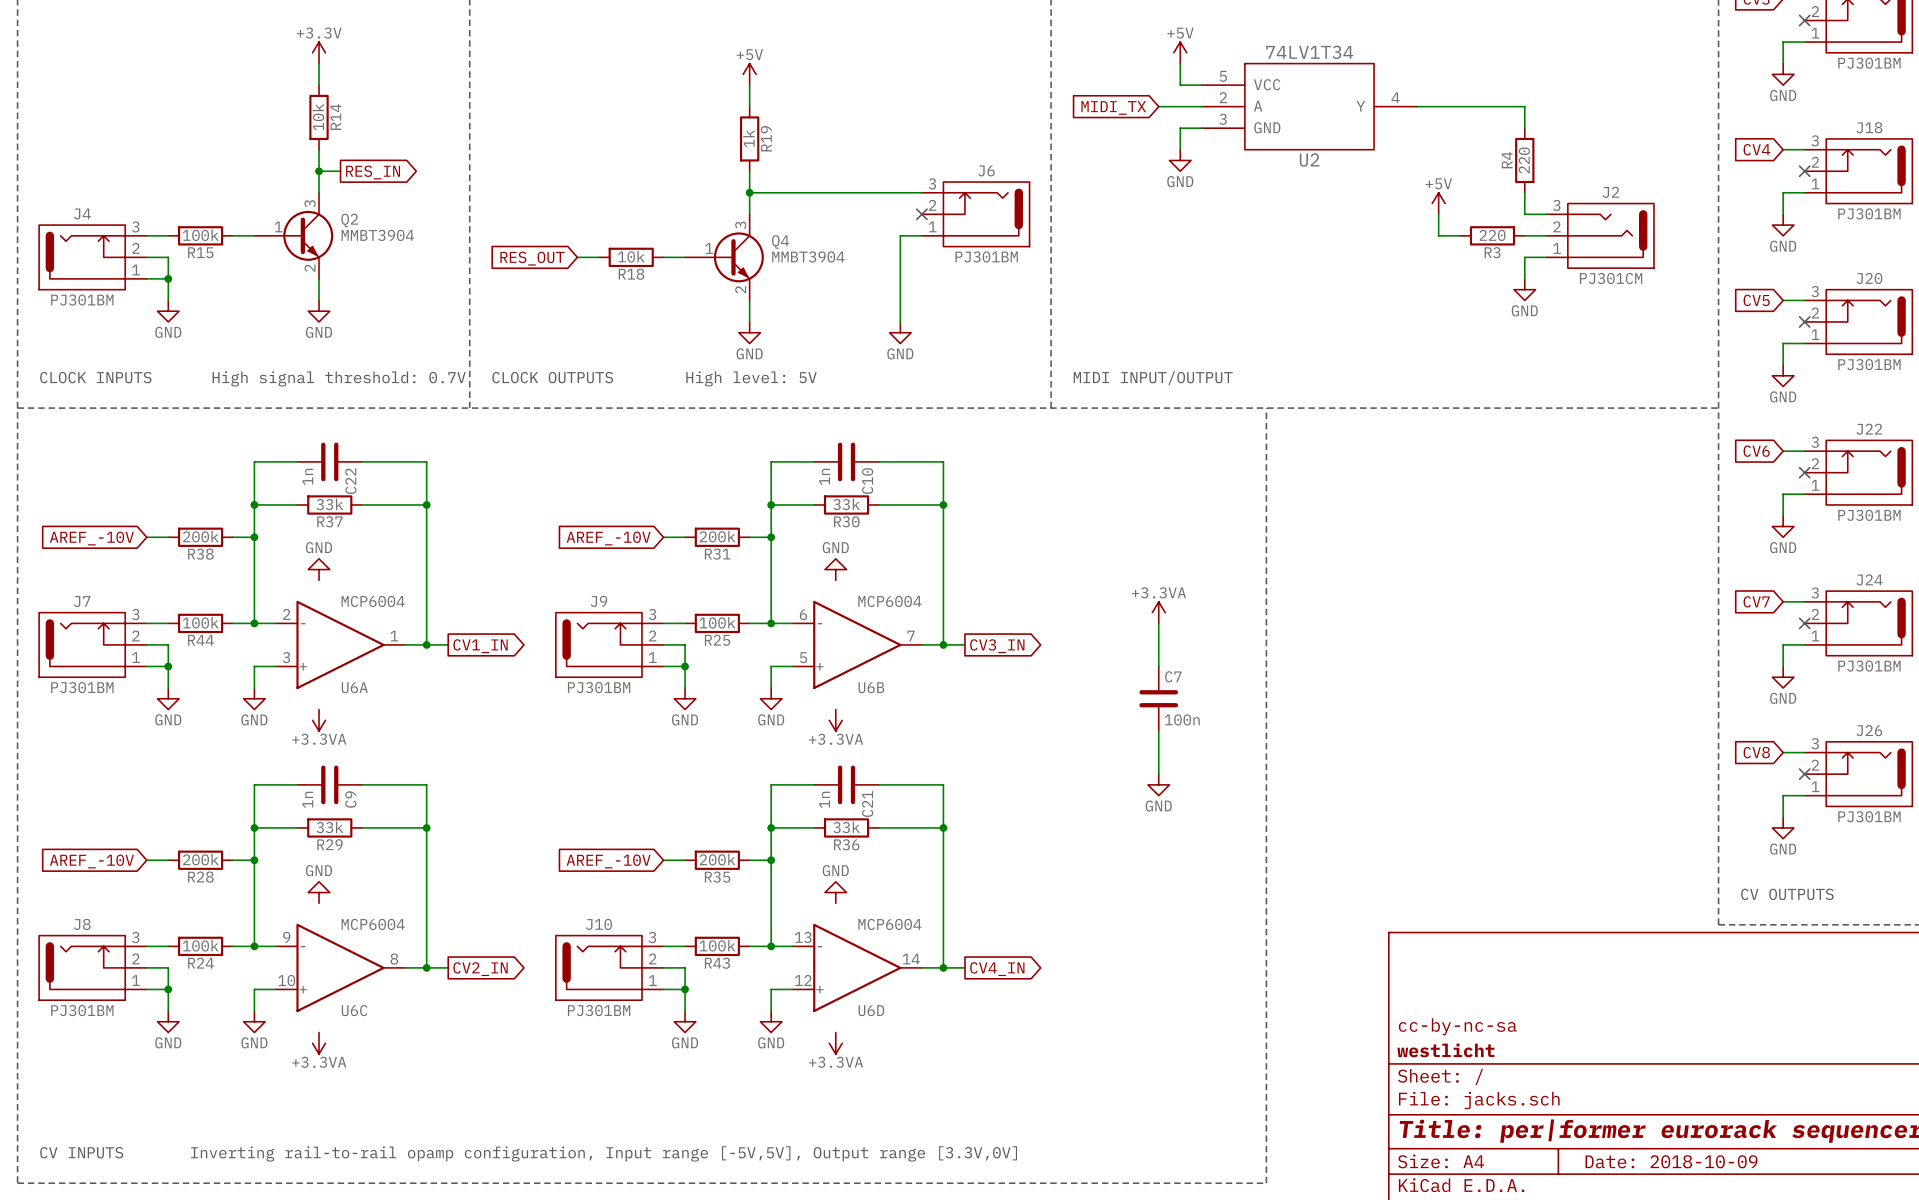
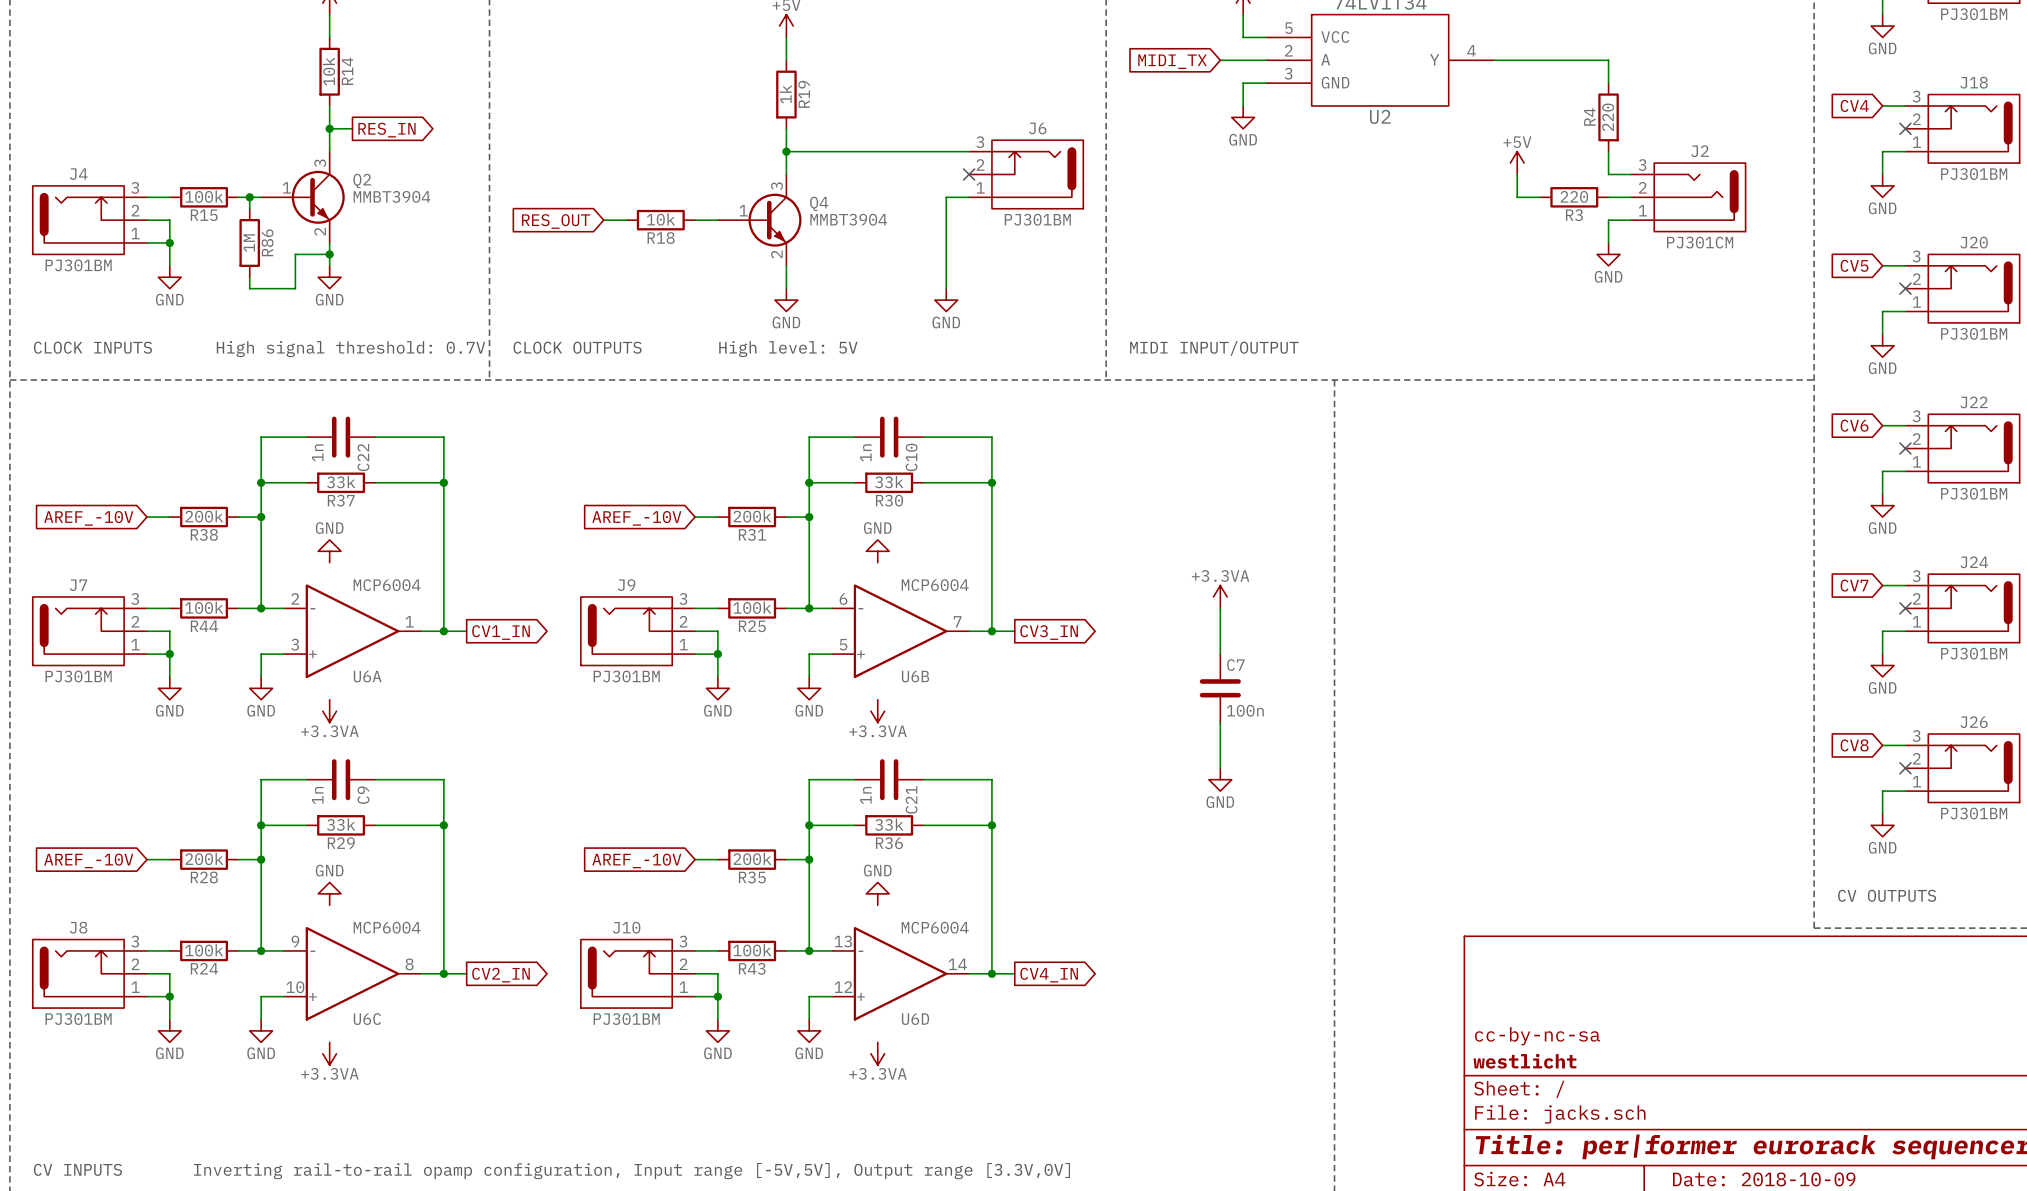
wire: none -> (249, 197) (249, 208)
junction: none -> (249, 197)
R86: none -> 1M (249, 242)
wire: none -> (329, 254) (295, 254) (295, 288) (249, 288) (249, 277)
junction: none -> (329, 254)

